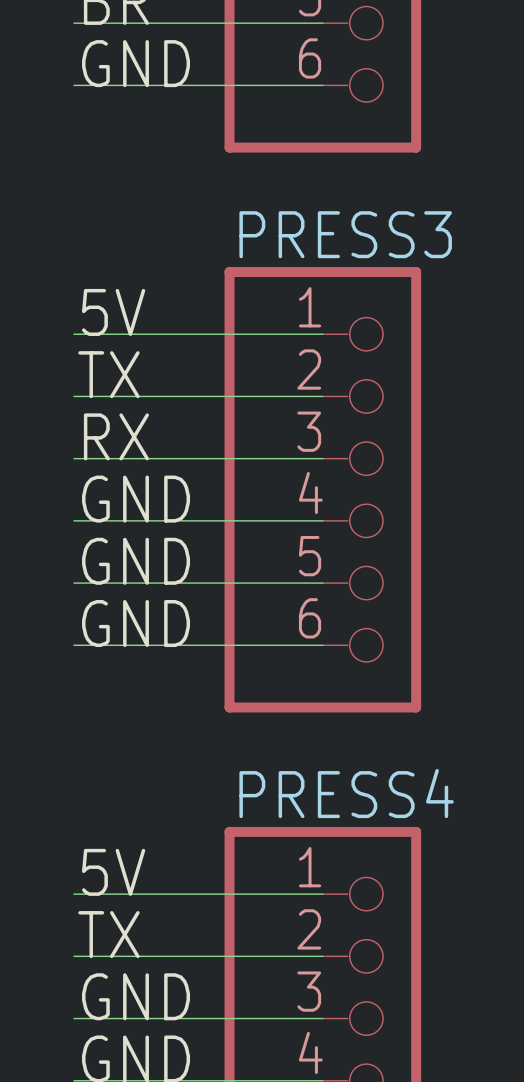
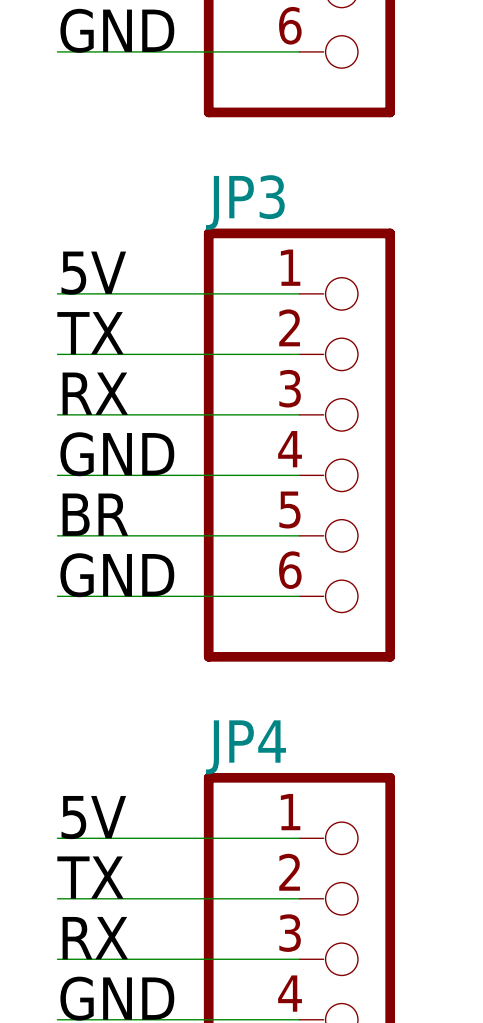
PRESS3 name: PRESS3 (345, 234) -> JP3 (245, 202)
label: GND (136, 561) -> BR (95, 514)
PRESS4 name: PRESS4 (346, 793) -> JP4 (245, 747)
label: GND (136, 996) -> RX (95, 938)

